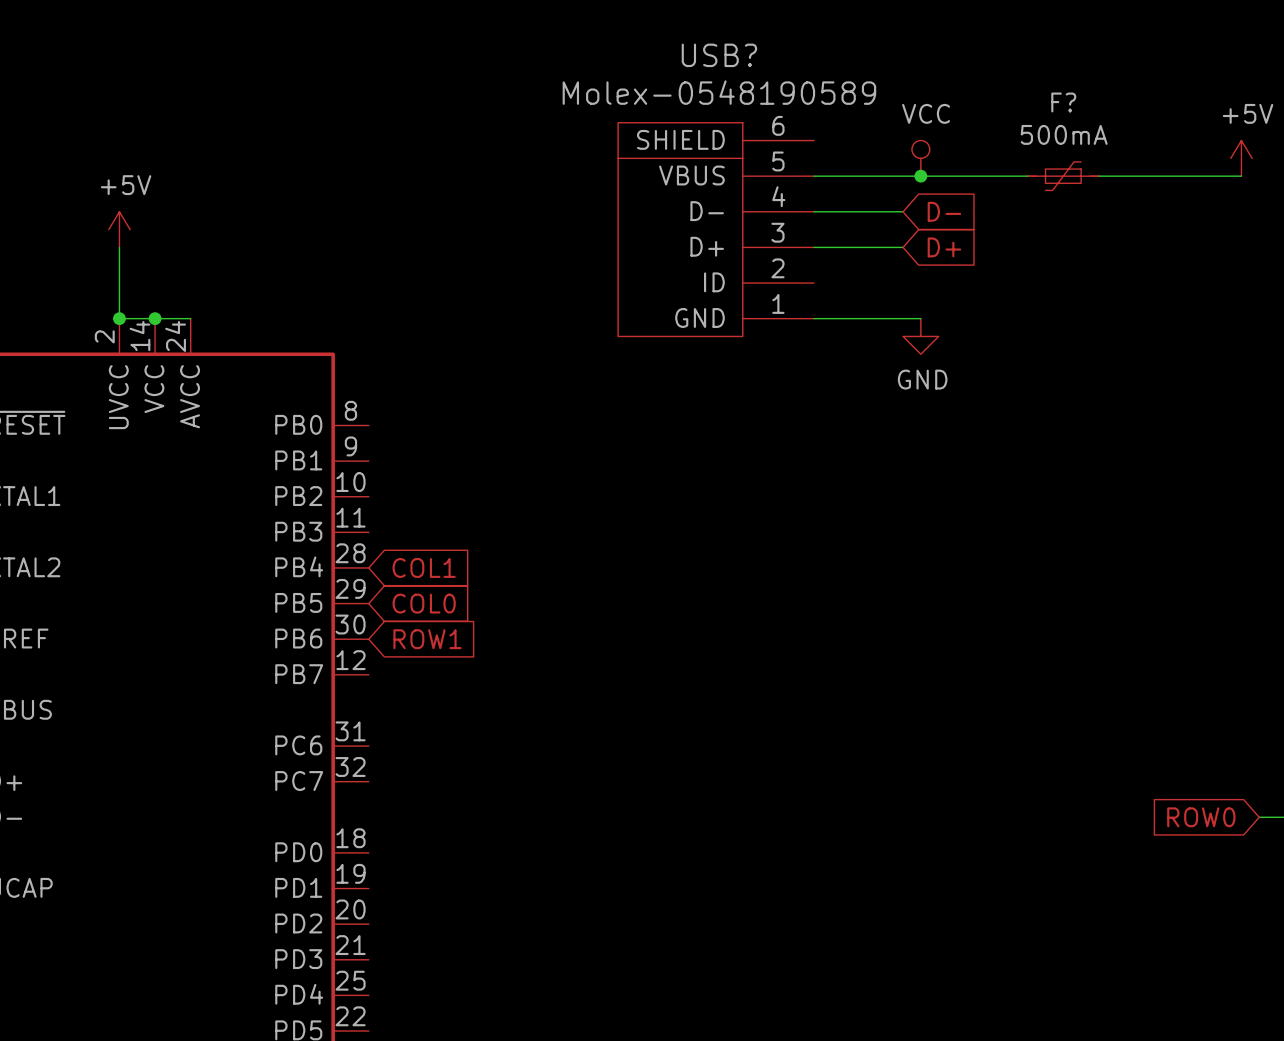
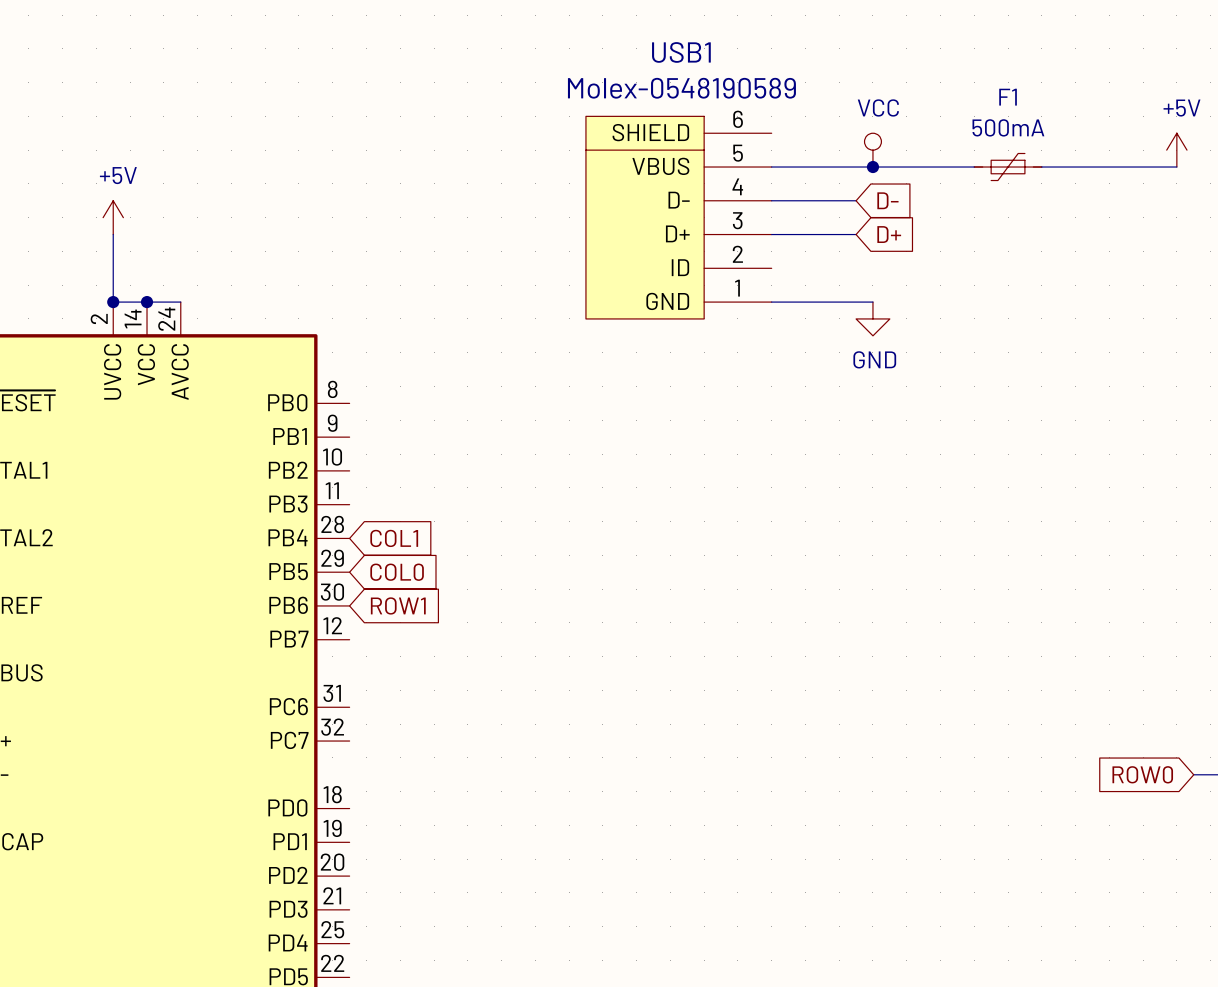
USB? name: USB? (719, 55) -> USB1 (681, 52)
F? name: F? (1063, 102) -> F1 (1008, 97)

